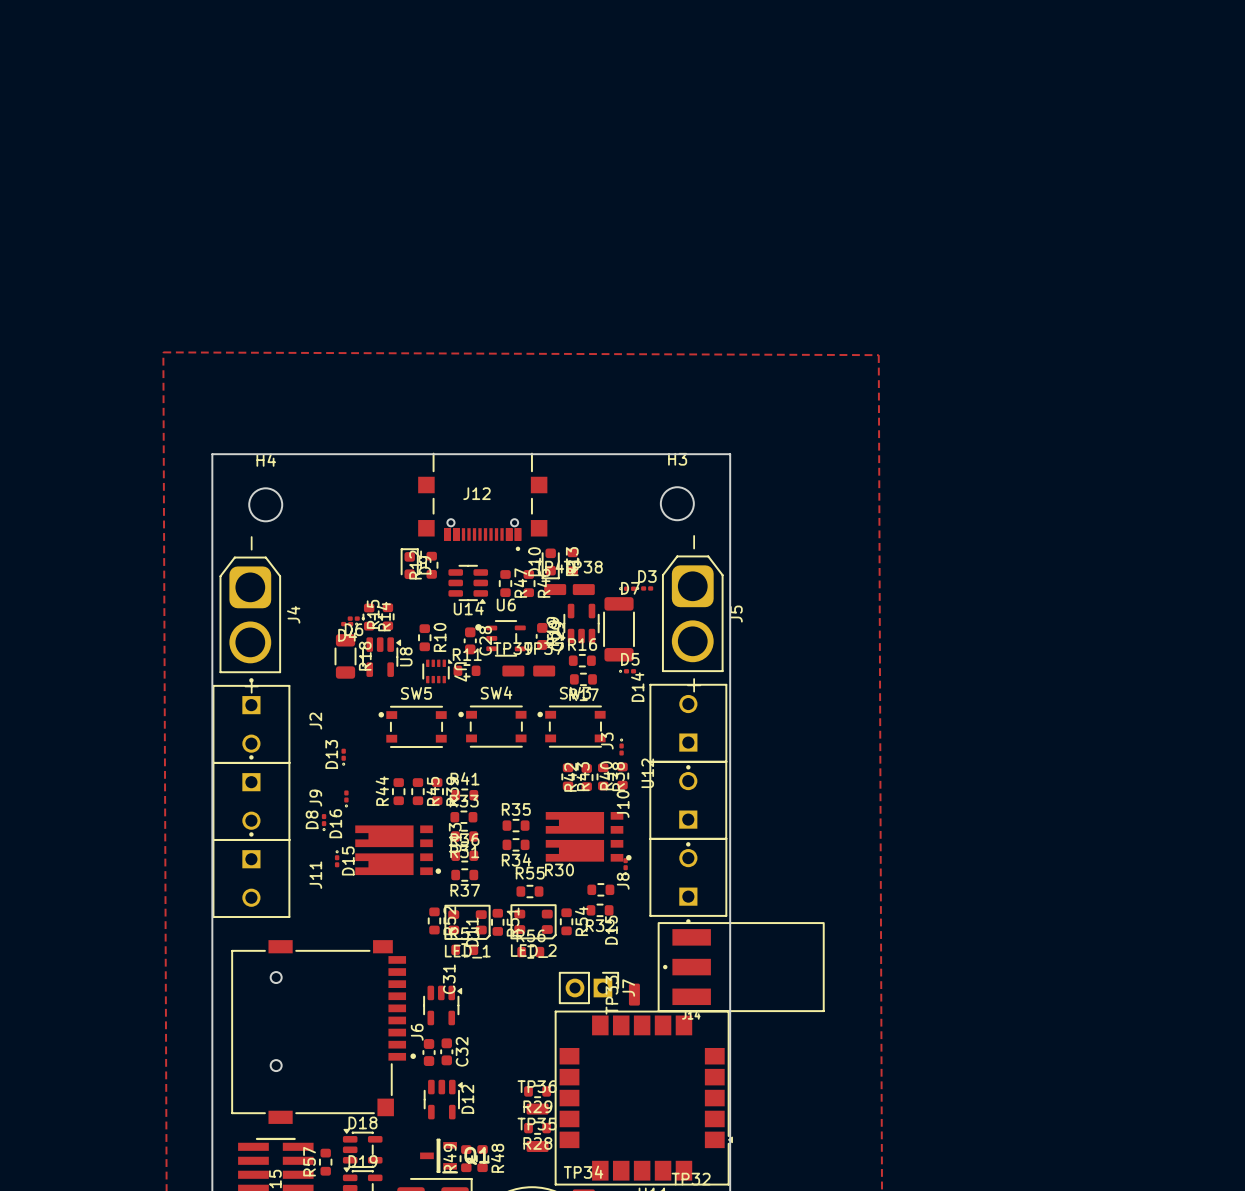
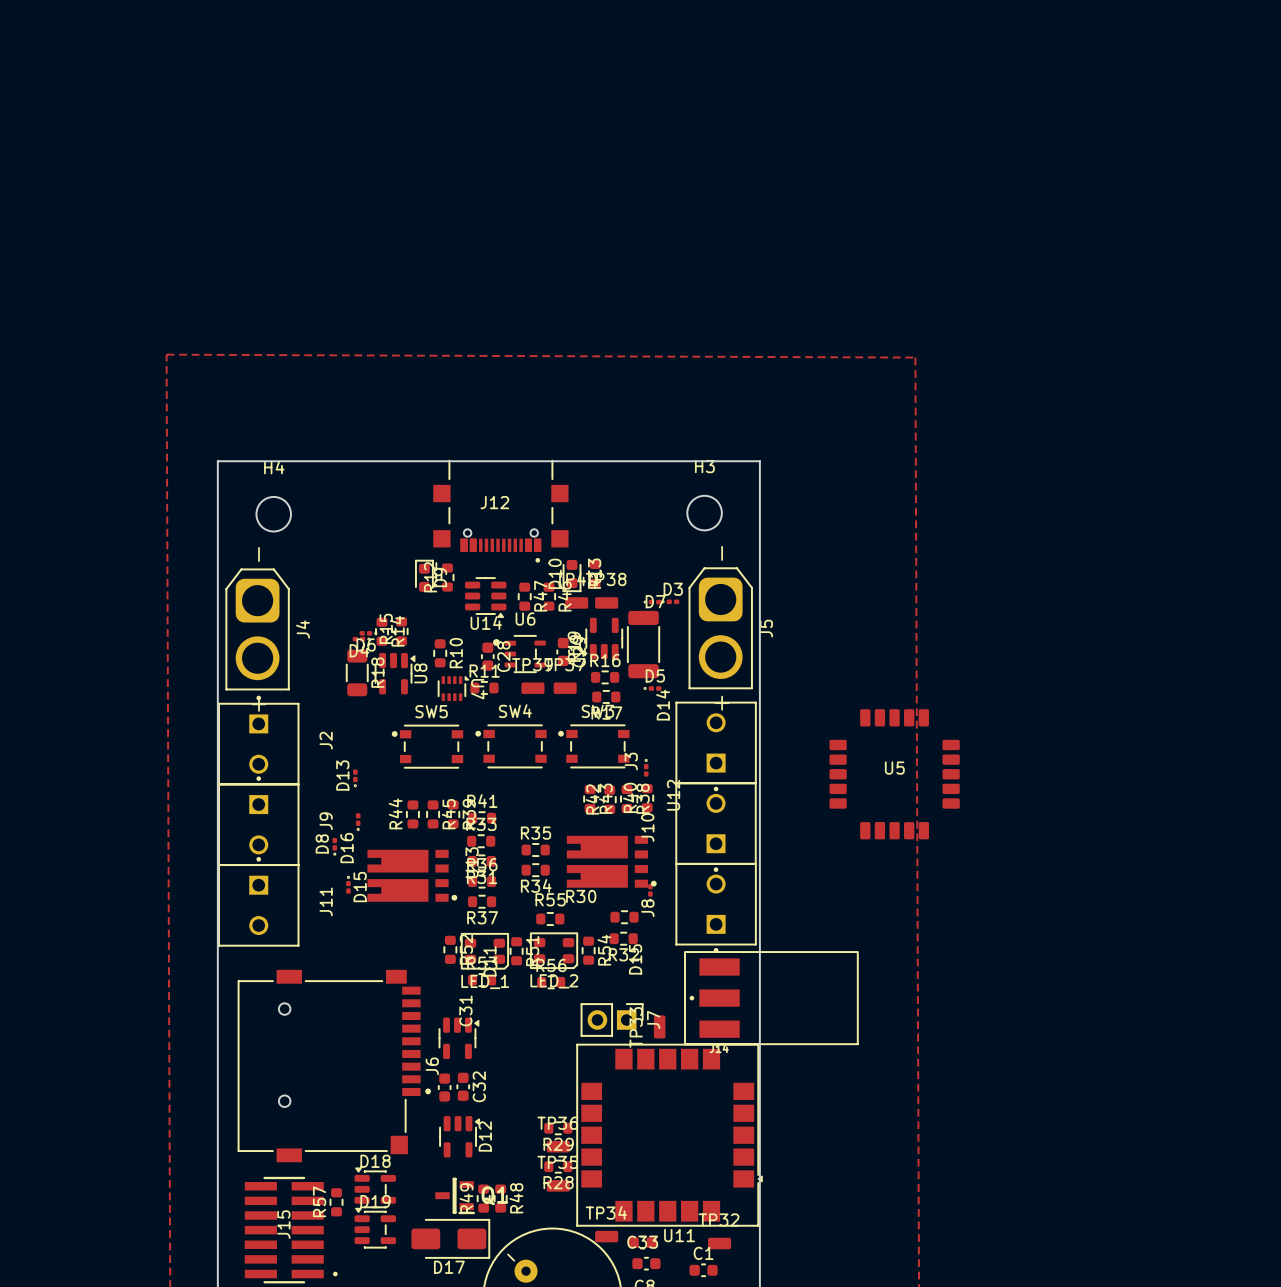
U5: none -> (894, 774)

